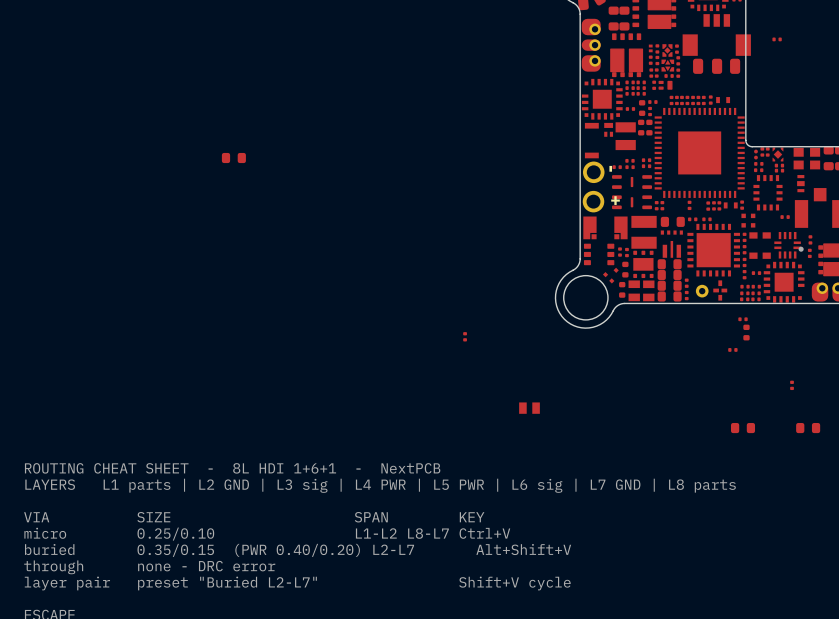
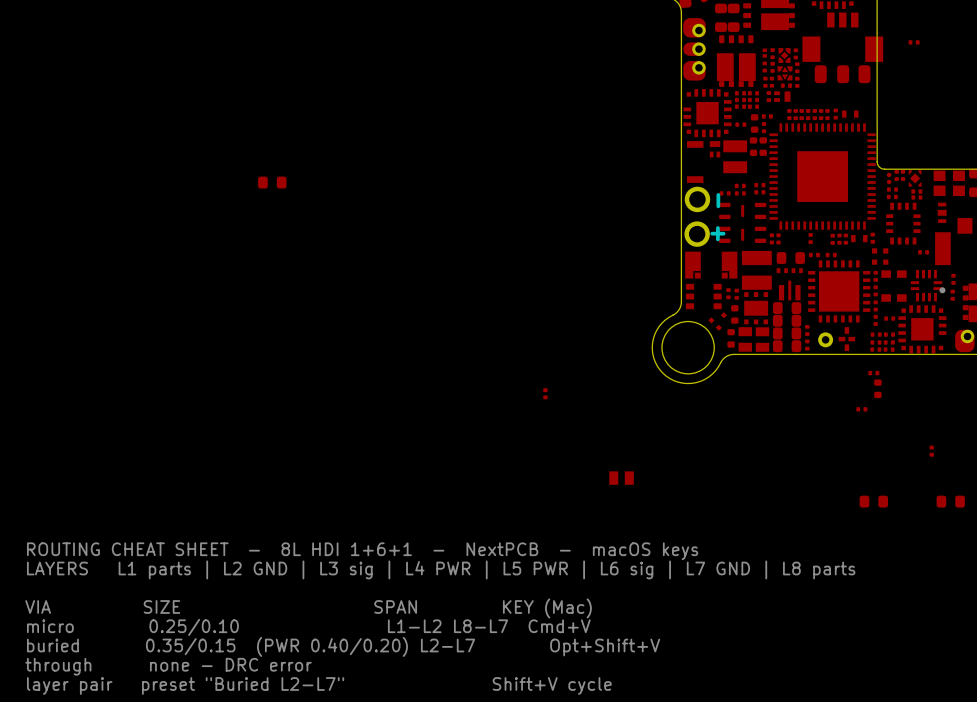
text: ROUTING CHEAT SHEET - 8L HDI 1+6+1 - NextPCB (232, 468) -> ROUTING CHEAT SHEET - 8L HDI 1+6+1 - NextPCB - macOS keys (362, 551)
text: VIA SIZE SPAN KEY (254, 517) -> VIA SIZE SPAN KEY (Mac) (308, 608)
text: micro 0.25/0.10 L1-L2 L8-L7 Ctrl+V (267, 534) -> micro 0.25/0.10 L1-L2 L8-L7 Cmd+V (308, 627)
text: buried 0.35/0.15 (PWR 0.40/0.20) L2-L7 Alt+Shift+V (298, 550) -> buried 0.35/0.15 (PWR 0.40/0.20) L2-L7 Opt+Shift+V (343, 646)

